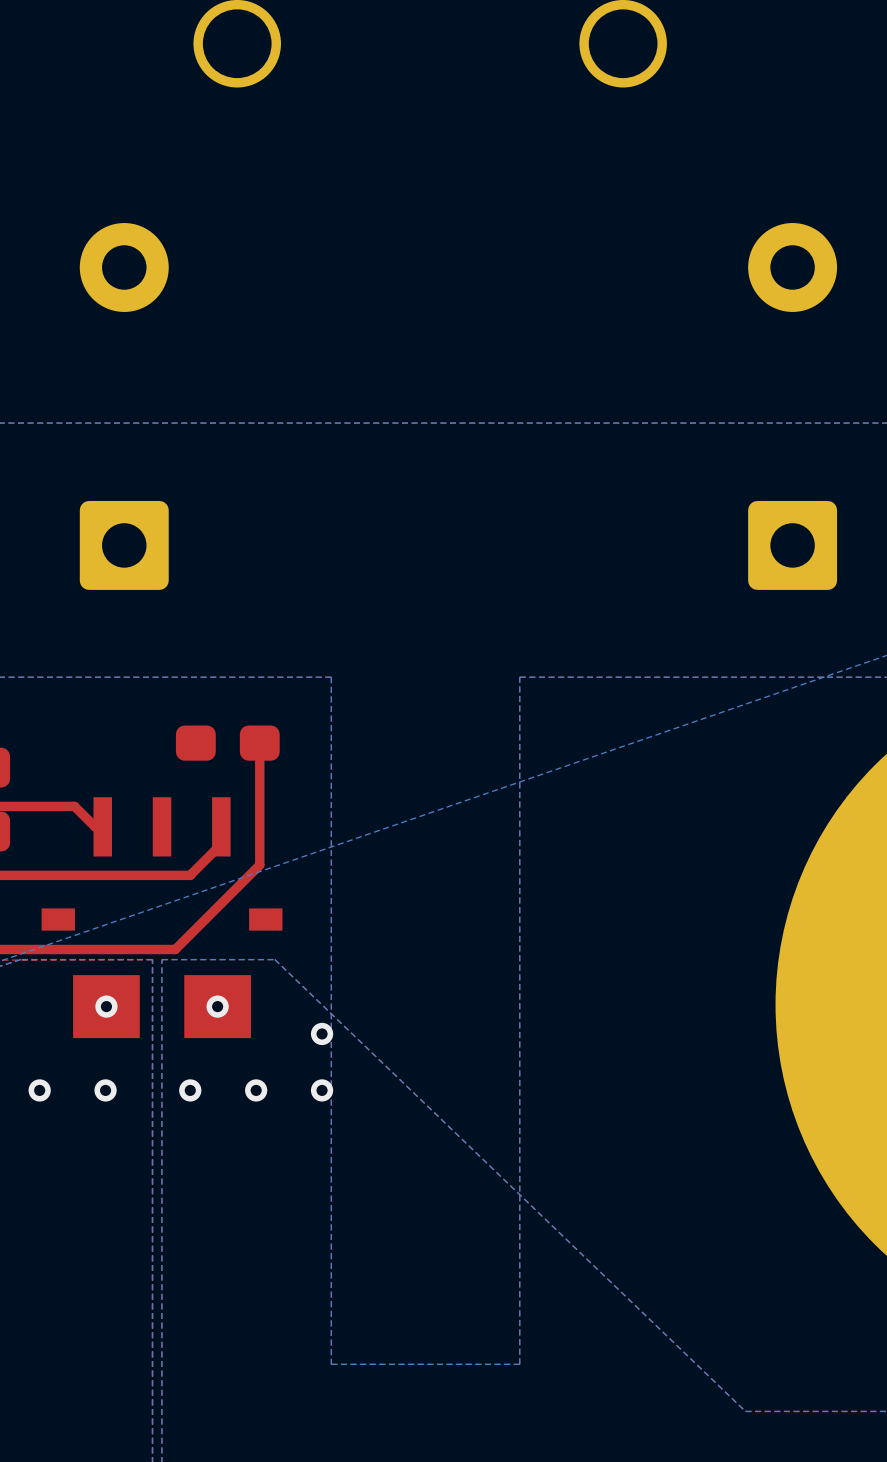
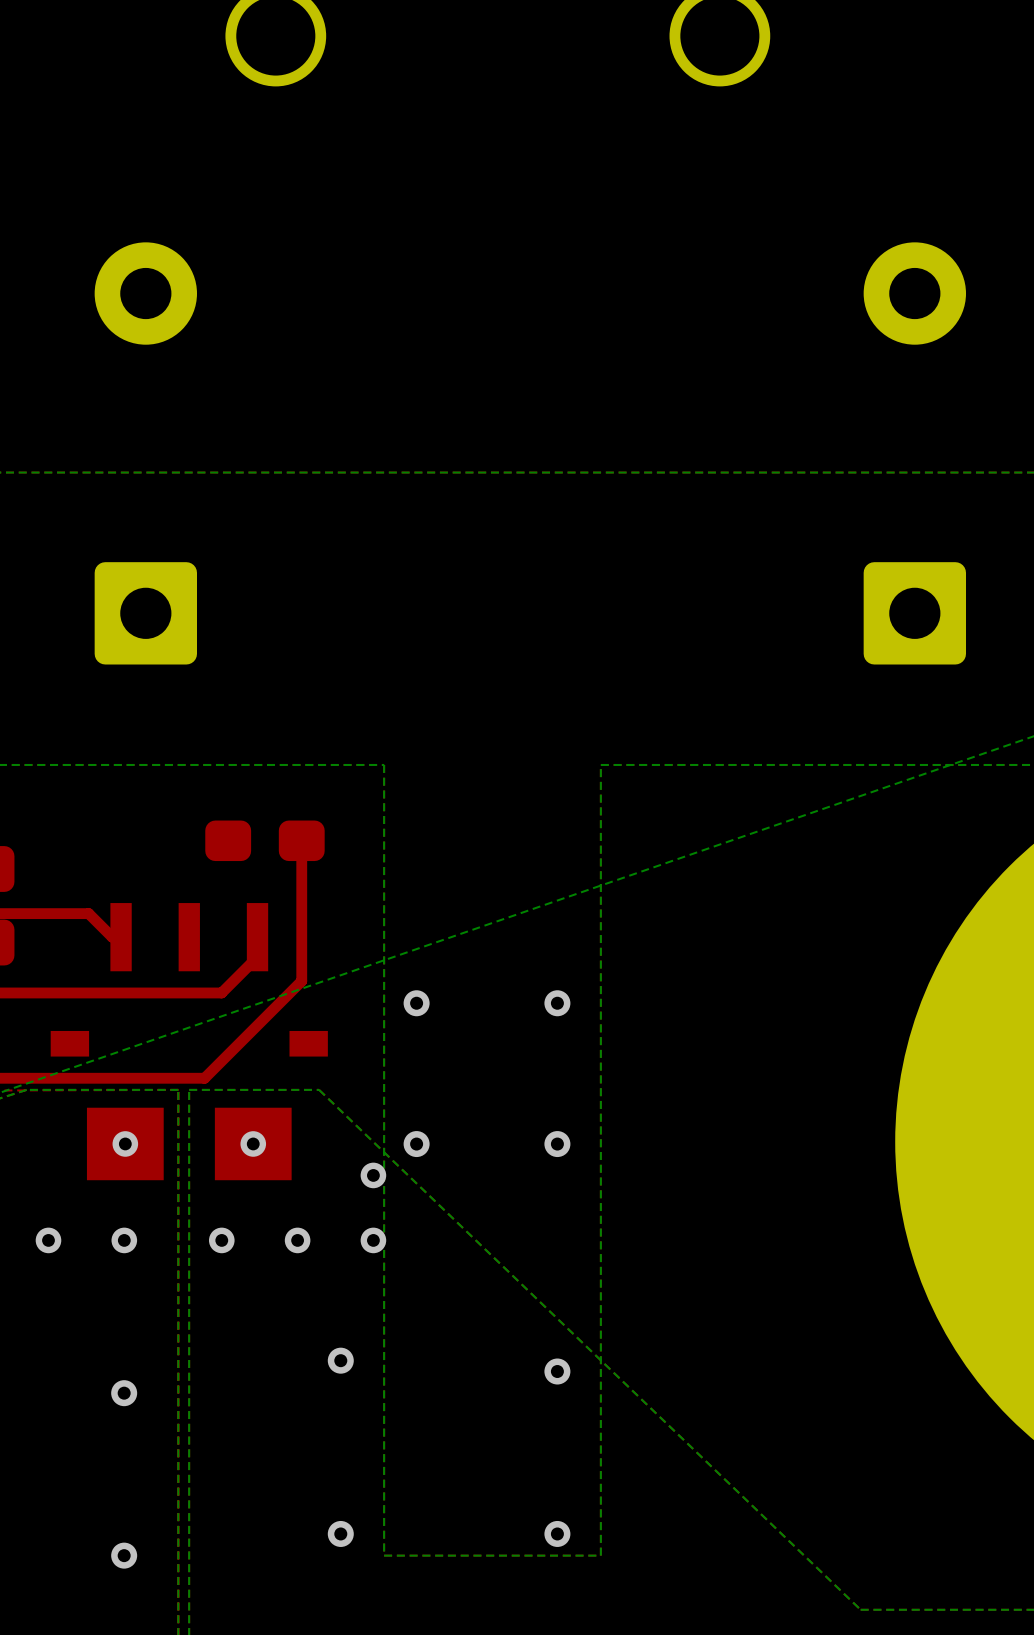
via: none -> (416, 1003)
via: none -> (557, 1003)
via: none -> (416, 1144)
via: none -> (557, 1144)
via: none -> (340, 1360)
via: none -> (557, 1371)
via: none -> (124, 1393)
via: none -> (340, 1533)
via: none -> (557, 1533)
via: none -> (124, 1555)

